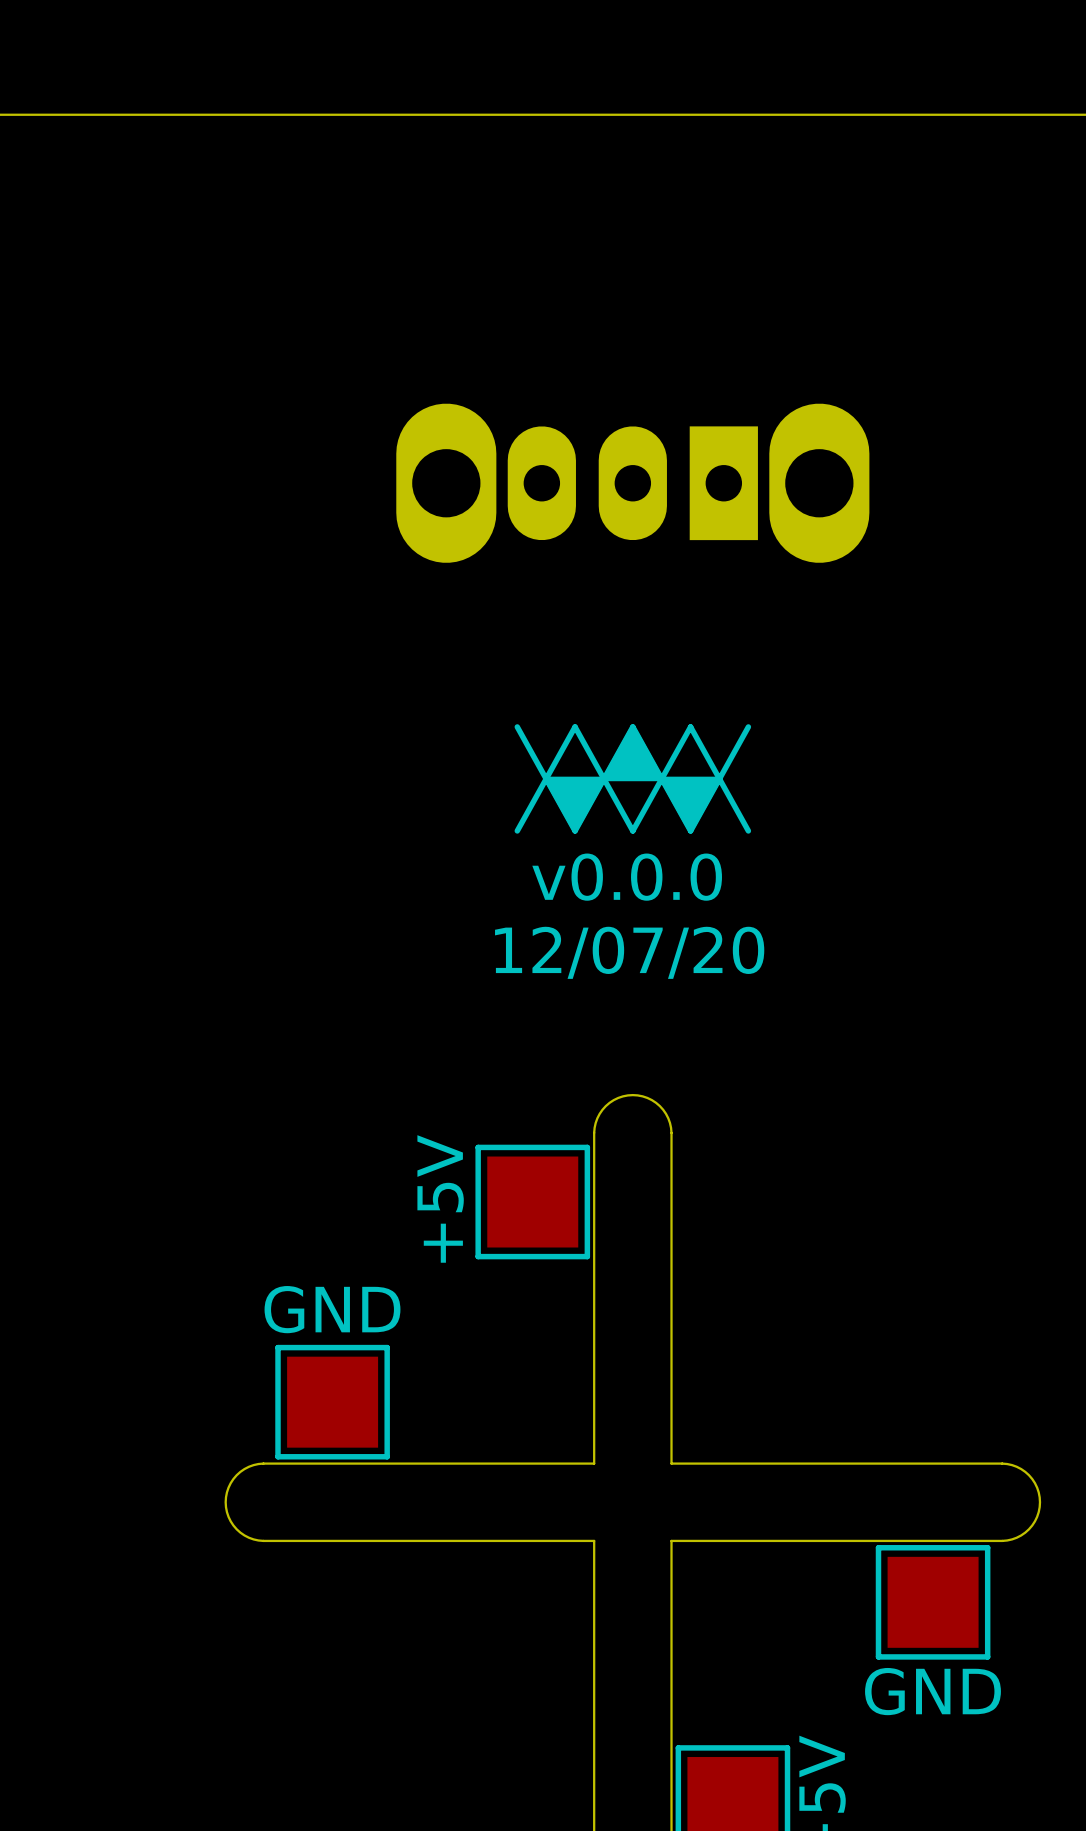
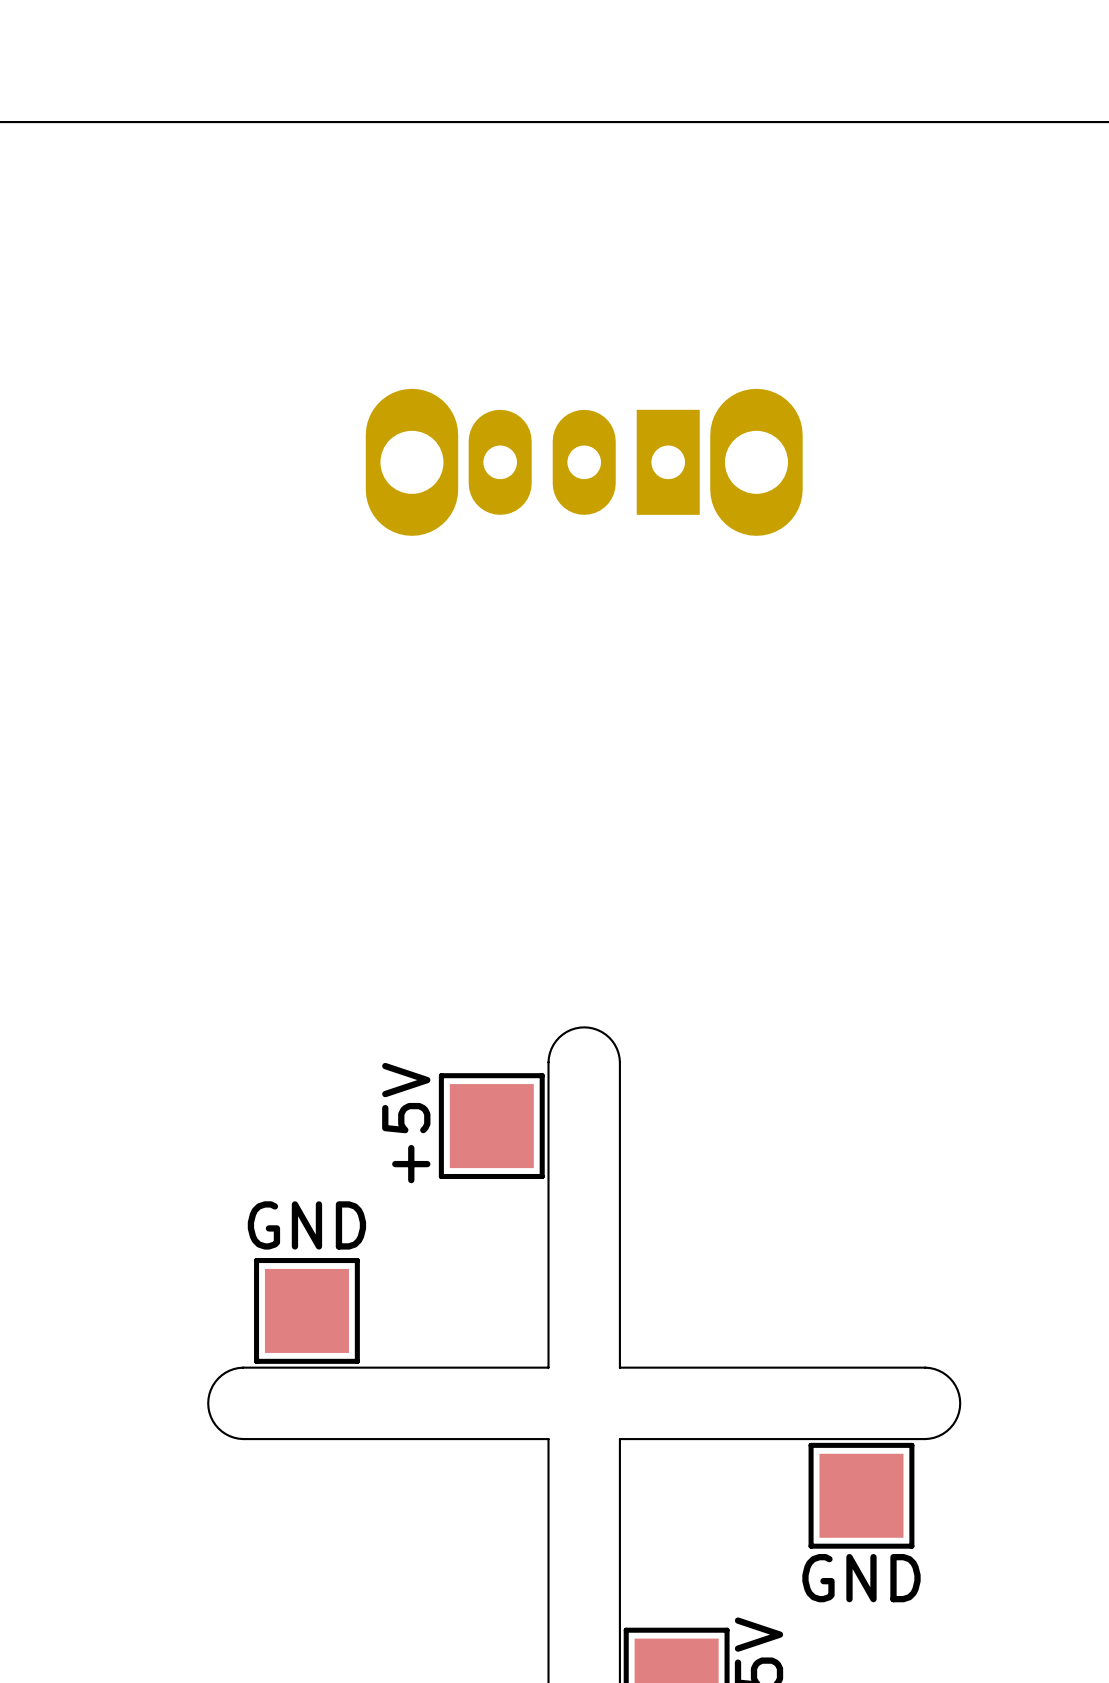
drawing: [514, 724, 752, 834] -> none
text: v0.0.0 (627, 877) -> none
text: 12/07/20 (629, 952) -> none

